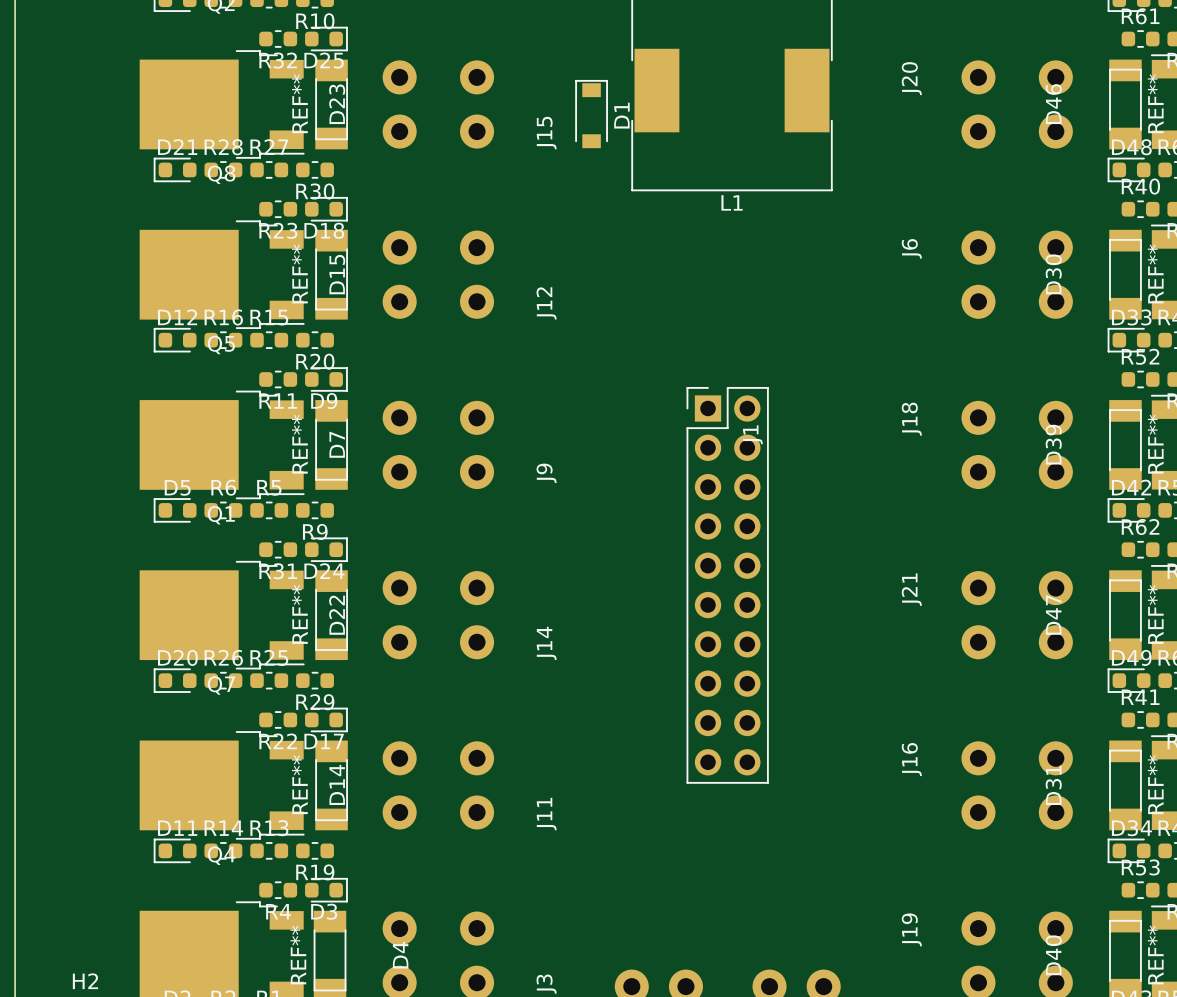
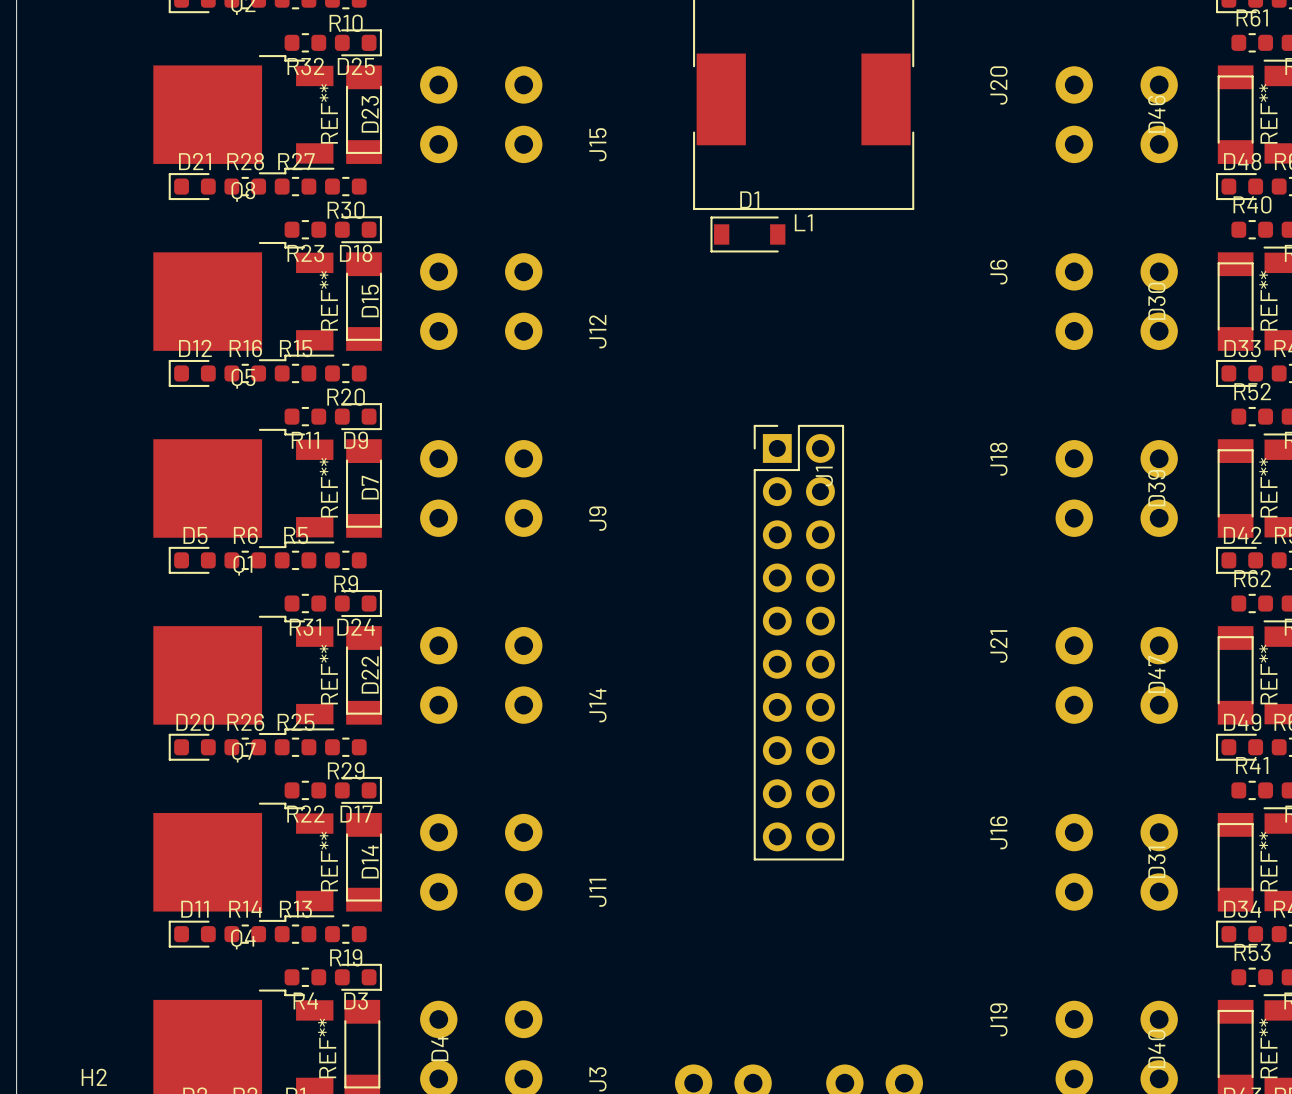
D1 rotation: 0° (591, 114) -> 90° counterclockwise (747, 234)
D1 position: (591, 114) -> (747, 234)

